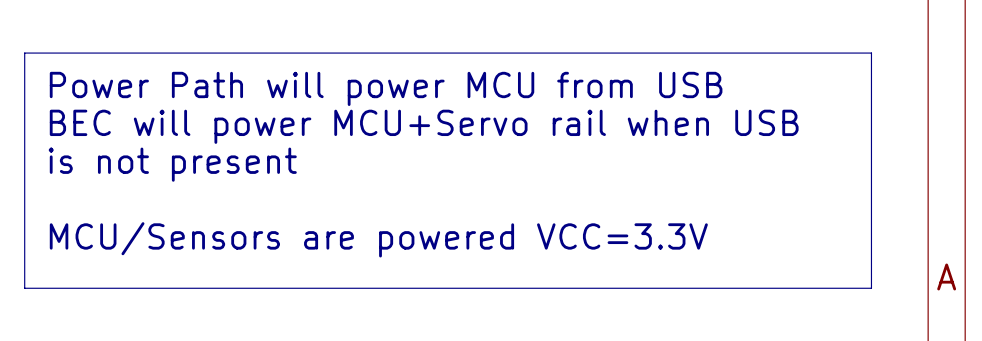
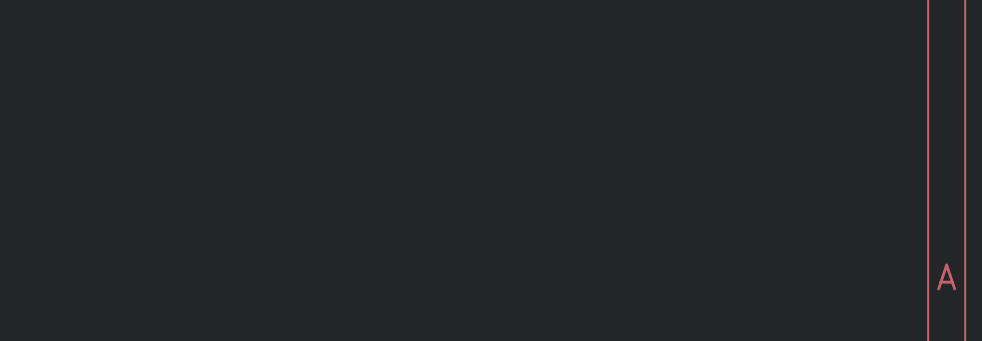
line: (24, 53) (871, 53) (871, 288) (24, 288) (24, 53) -> none
text: Power Path will power MCU from USB (386, 88) -> none
text: BEC will power MCU+Servo rail when USB (424, 126) -> none
text: is not present (172, 164) -> none
text: MCU/Sensors are powered VCC=3.3V (378, 239) -> none

